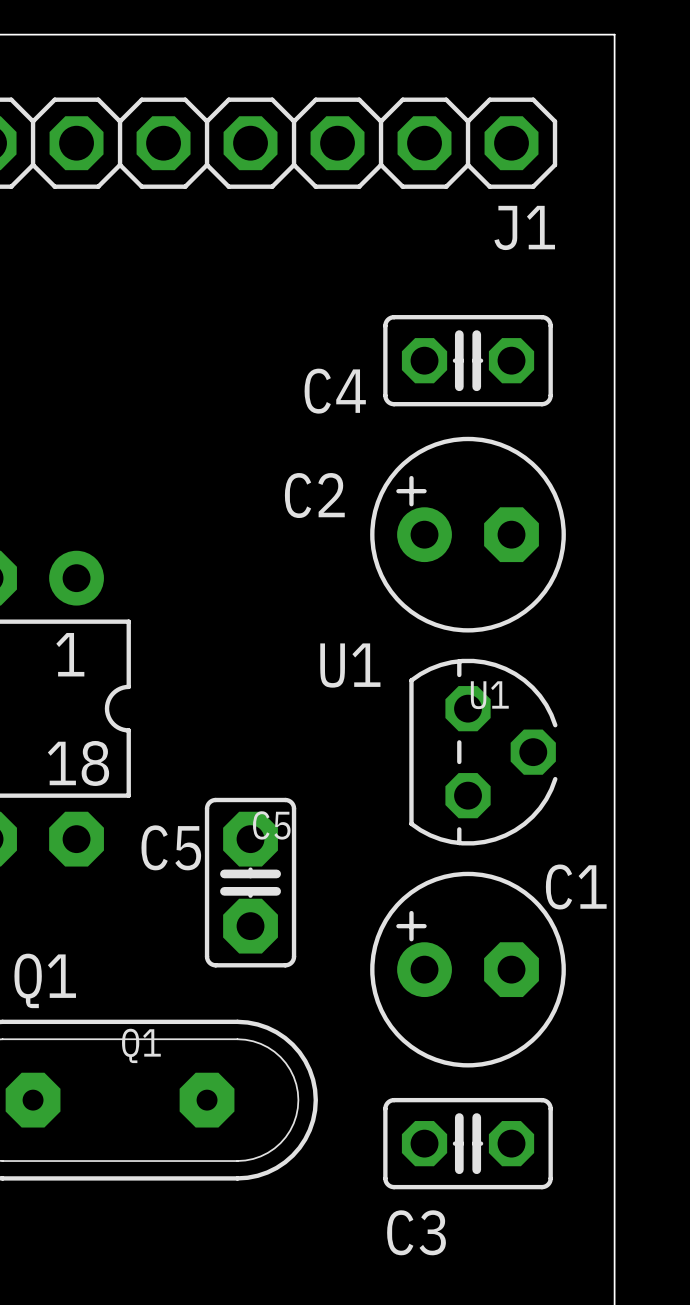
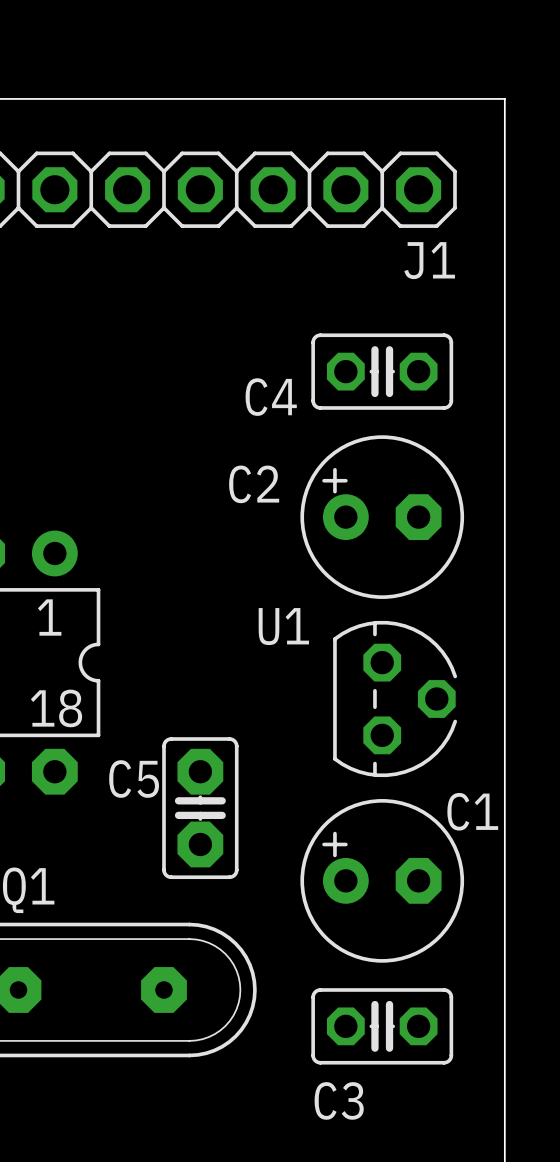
text: U1 (489, 695) -> none
text: C5 (271, 825) -> none
text: Q1 (141, 1045) -> none

